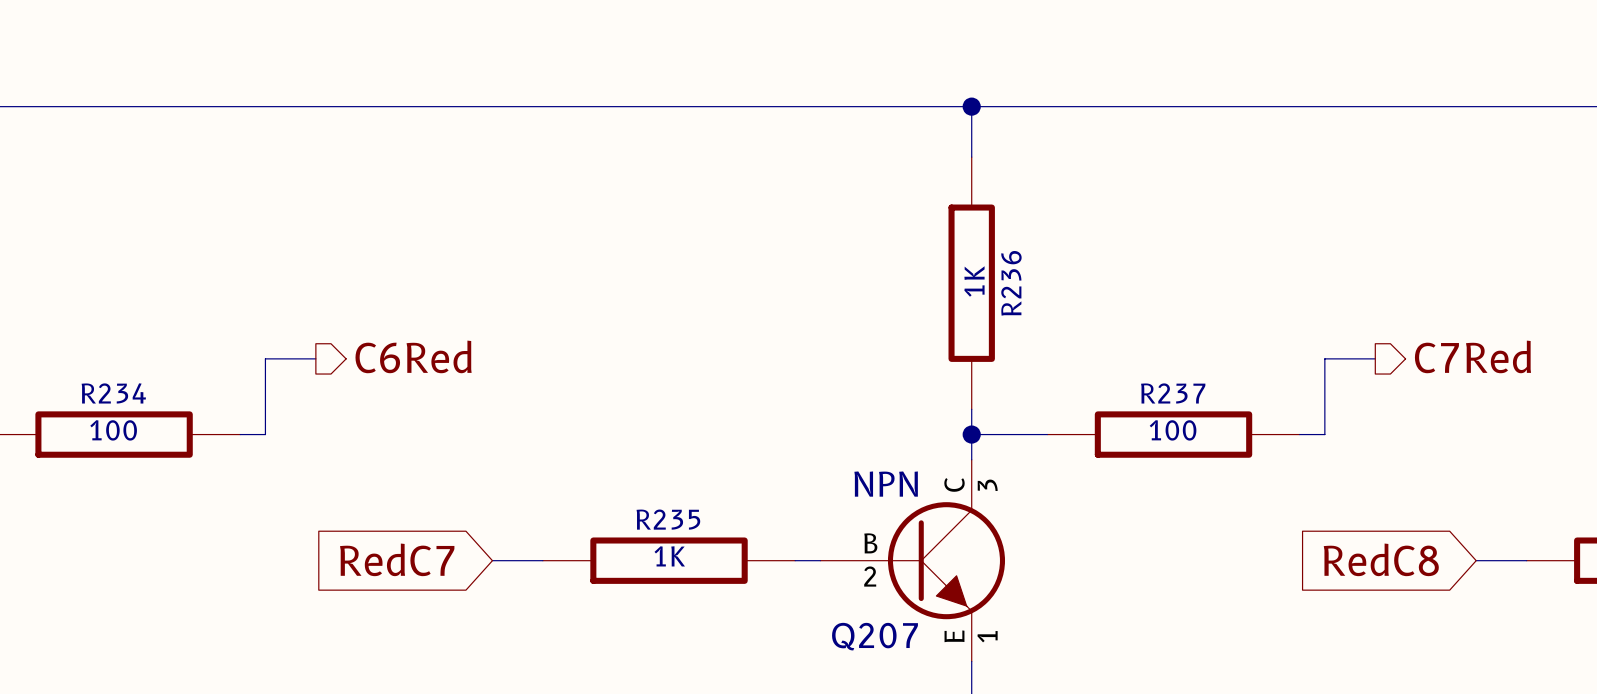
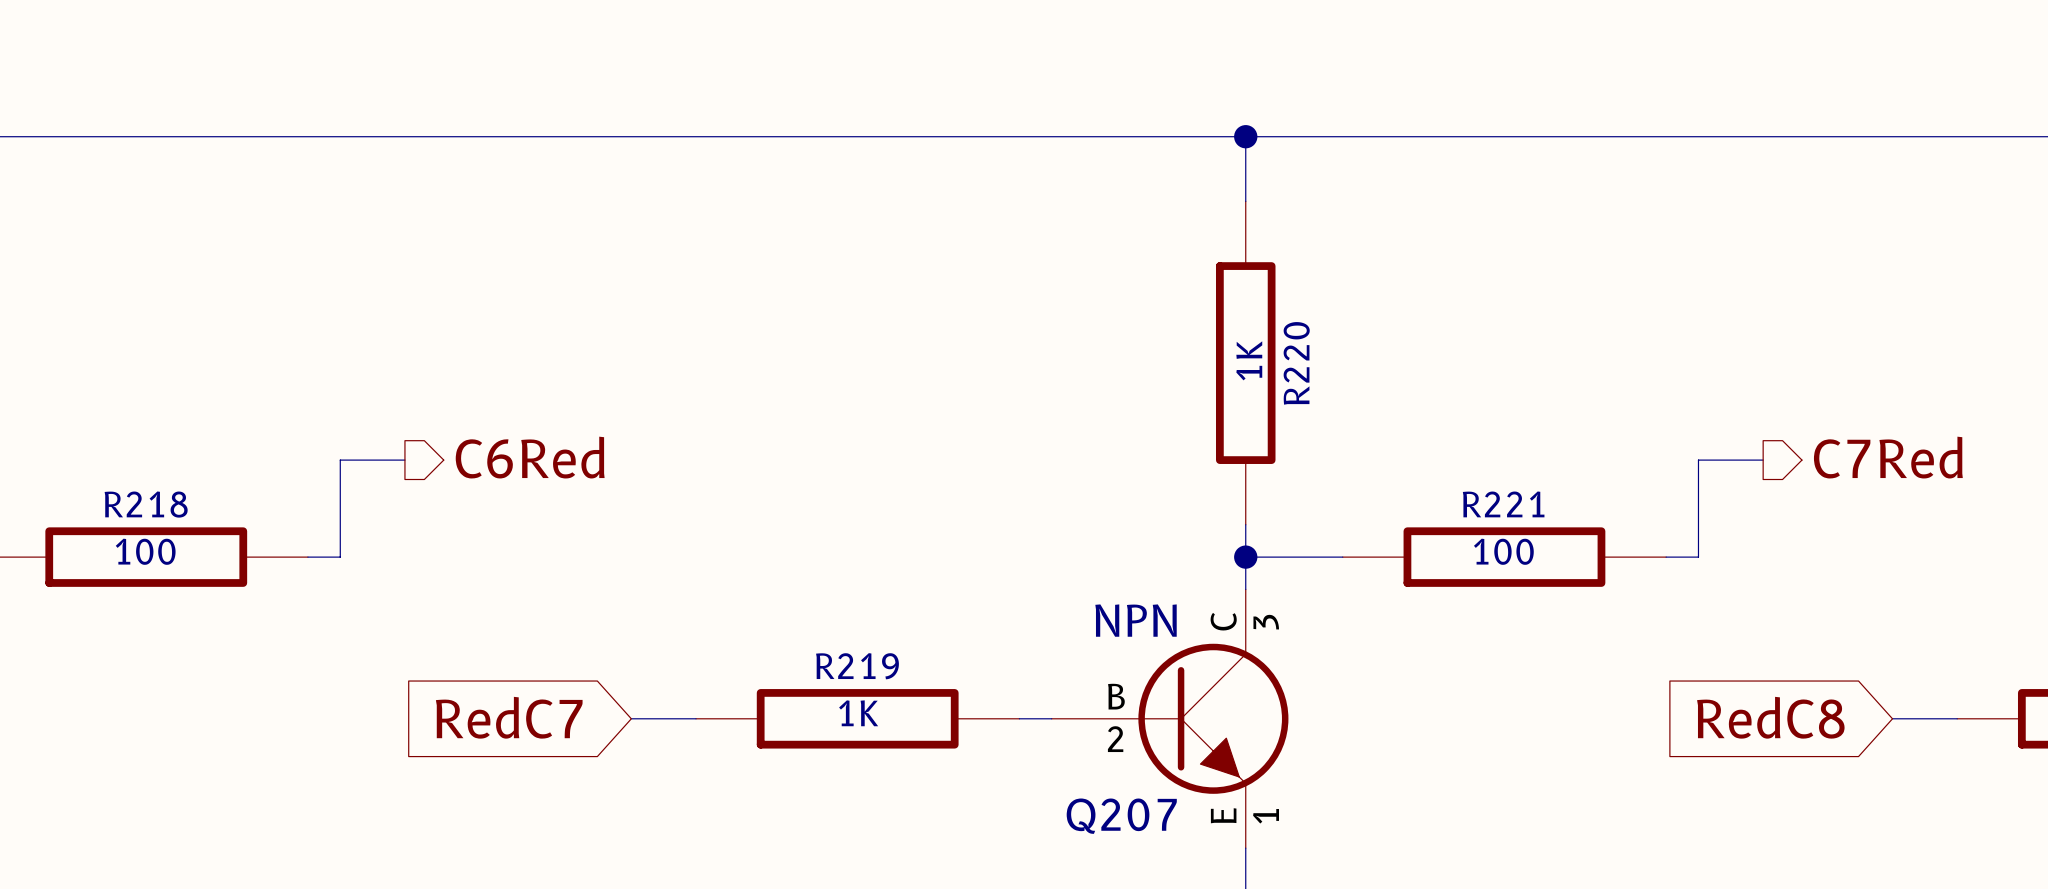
R236 name: R236 (1011, 283) -> R220 (1296, 363)
R234 name: R234 (113, 393) -> R218 (146, 504)
R237 name: R237 (1173, 393) -> R221 (1503, 504)
R235 name: R235 (668, 519) -> R219 (857, 666)

